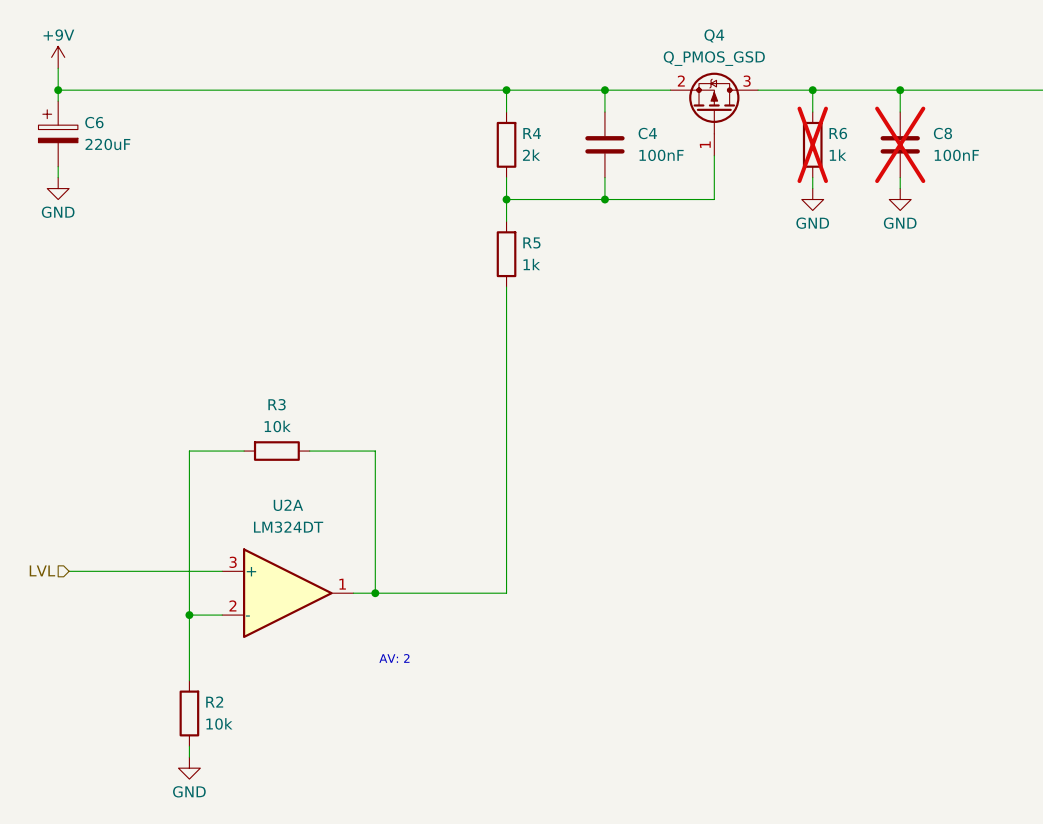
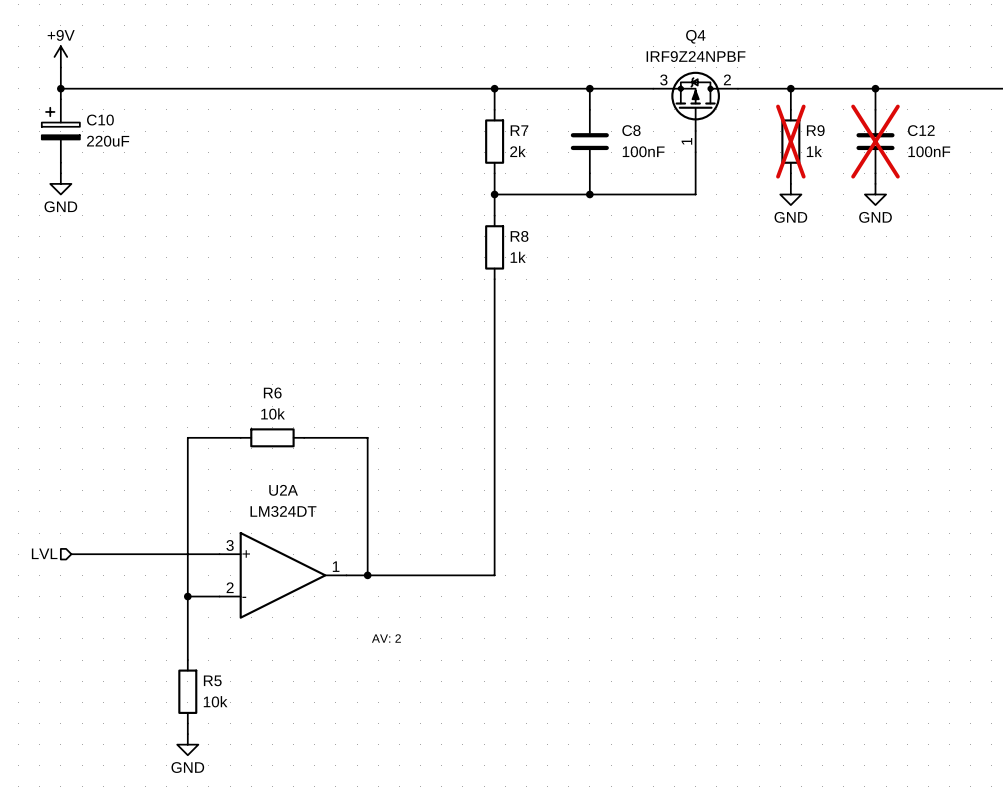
Q4 value: Q_PMOS_GSD (714, 58) -> IRF9Z24NPBF (696, 56)
Q4 pin number: 2 (681, 81) -> 3 (663, 79)
Q4 pin number: 3 (747, 81) -> 2 (727, 79)
C6 name: C6 (94, 122) -> C10 (100, 120)
R4 name: R4 (532, 133) -> R7 (519, 130)
C4 name: C4 (647, 133) -> C8 (631, 130)
R6 name: R6 (838, 133) -> R9 (815, 130)
C8 name: C8 (942, 133) -> C12 (921, 130)
R5 name: R5 (531, 242) -> R8 (519, 236)
R3 name: R3 (277, 404) -> R6 (272, 393)
R2 name: R2 (214, 702) -> R5 (212, 680)

